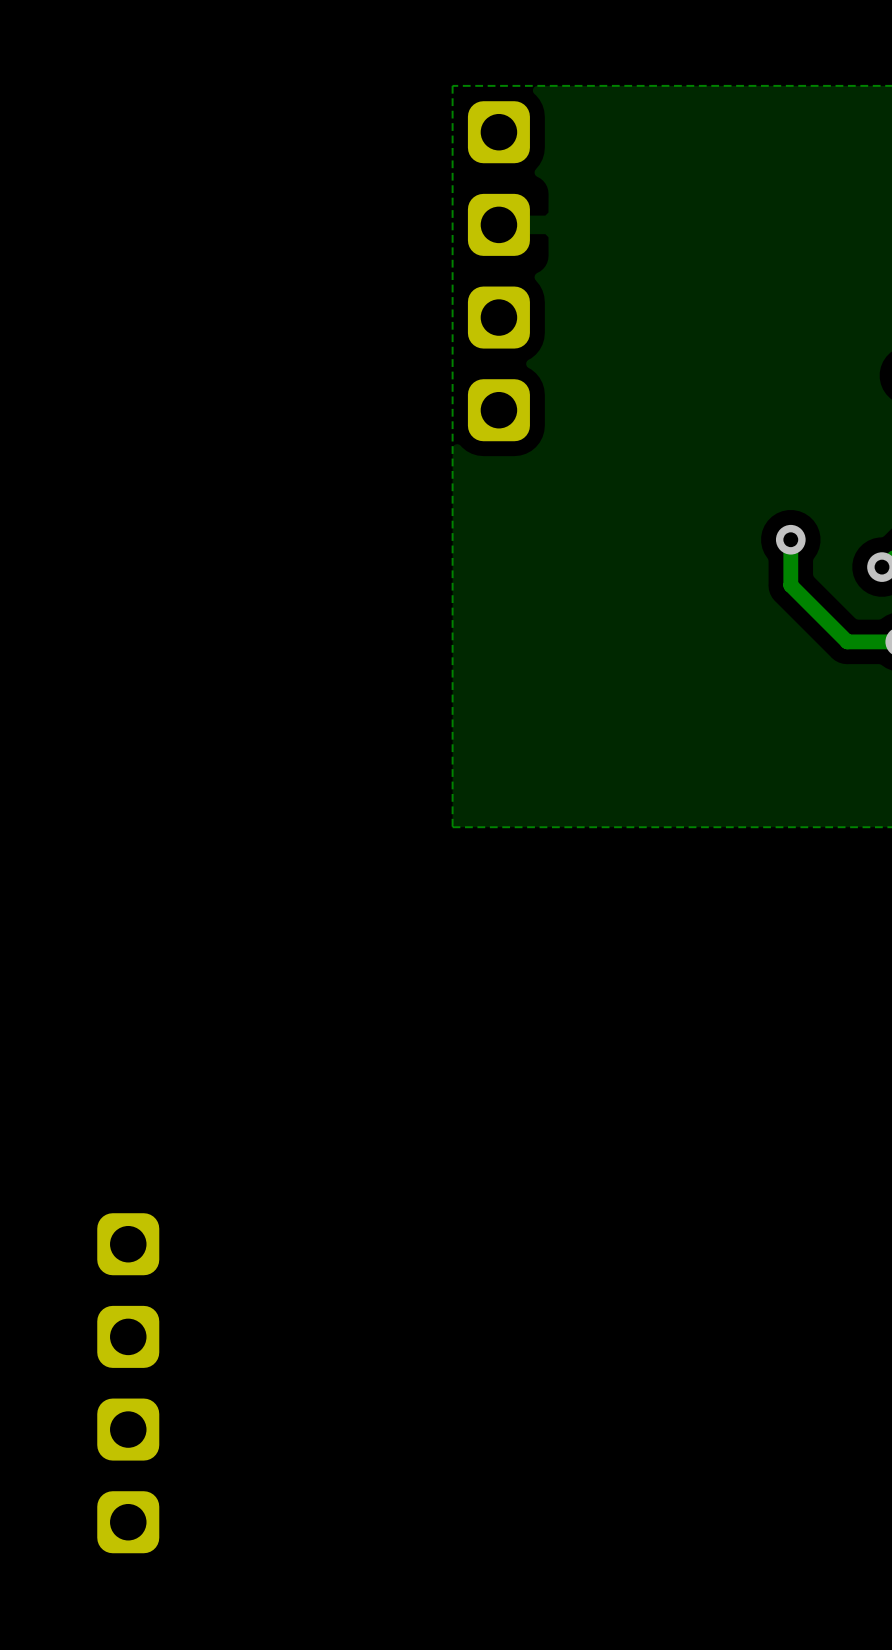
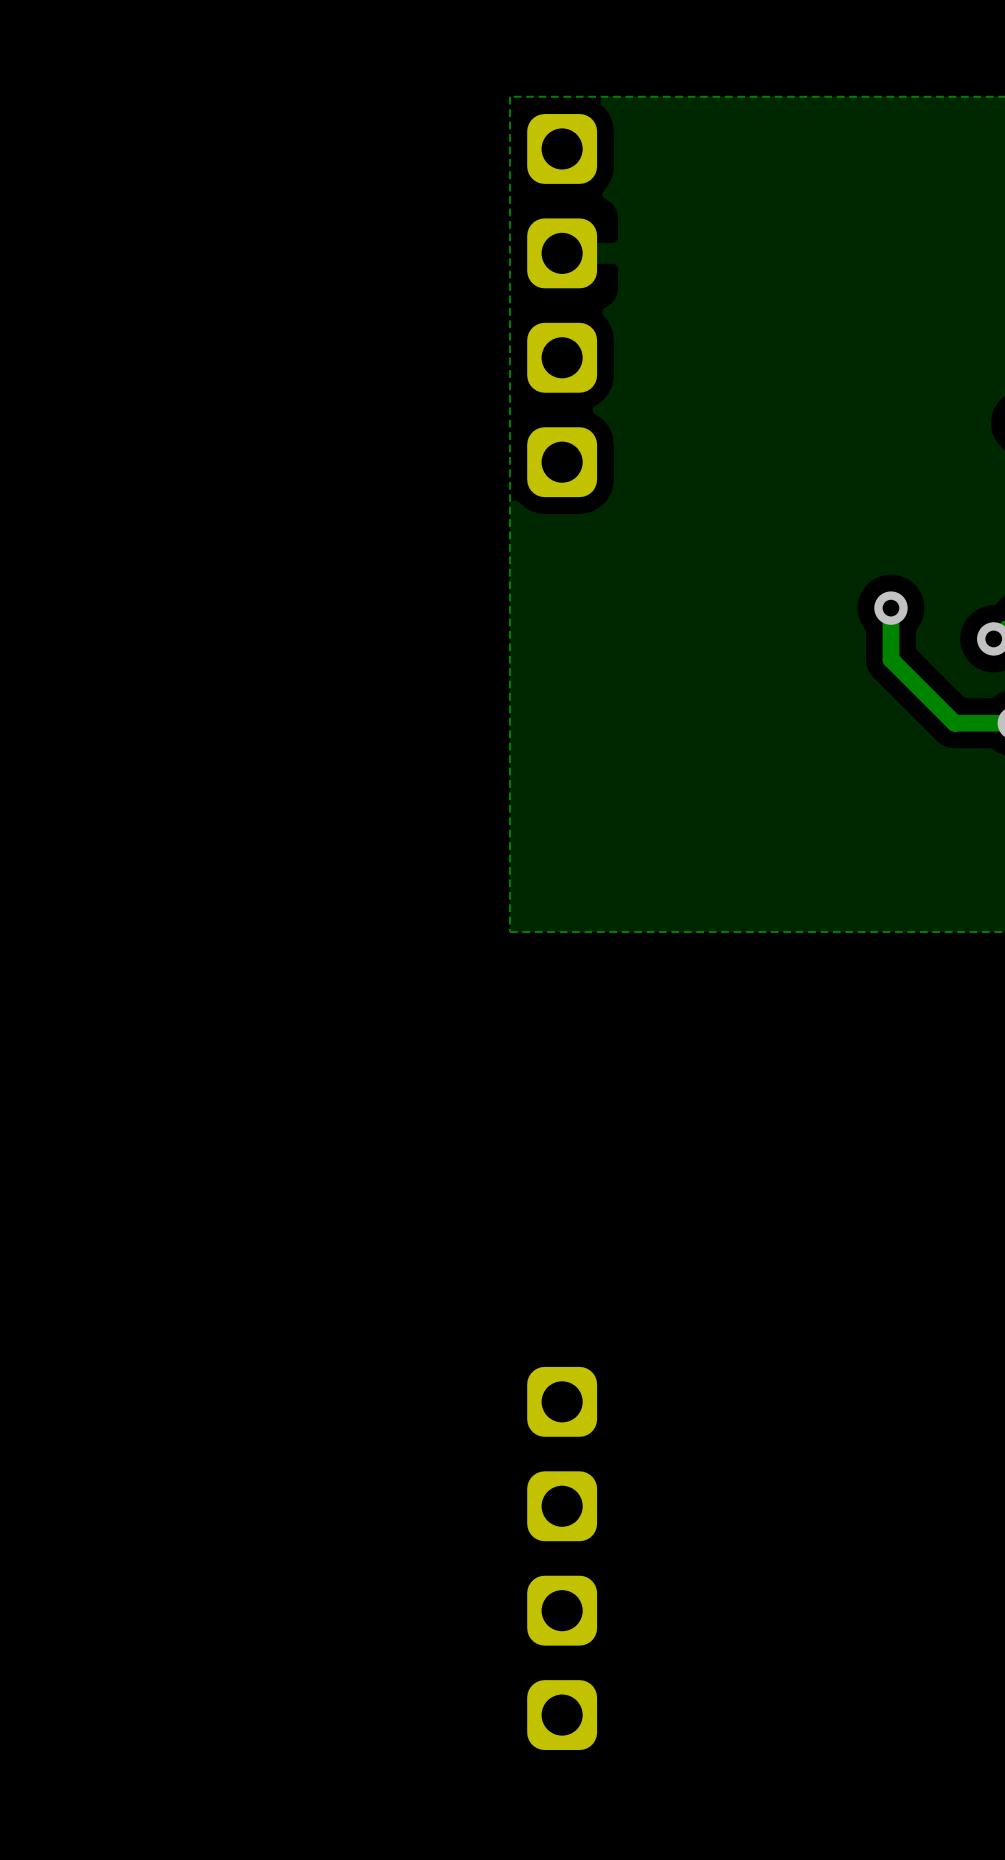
part: (128, 1290) -> none
part: none -> (562, 1454)
part: (128, 1475) -> none
part: none -> (562, 1662)

